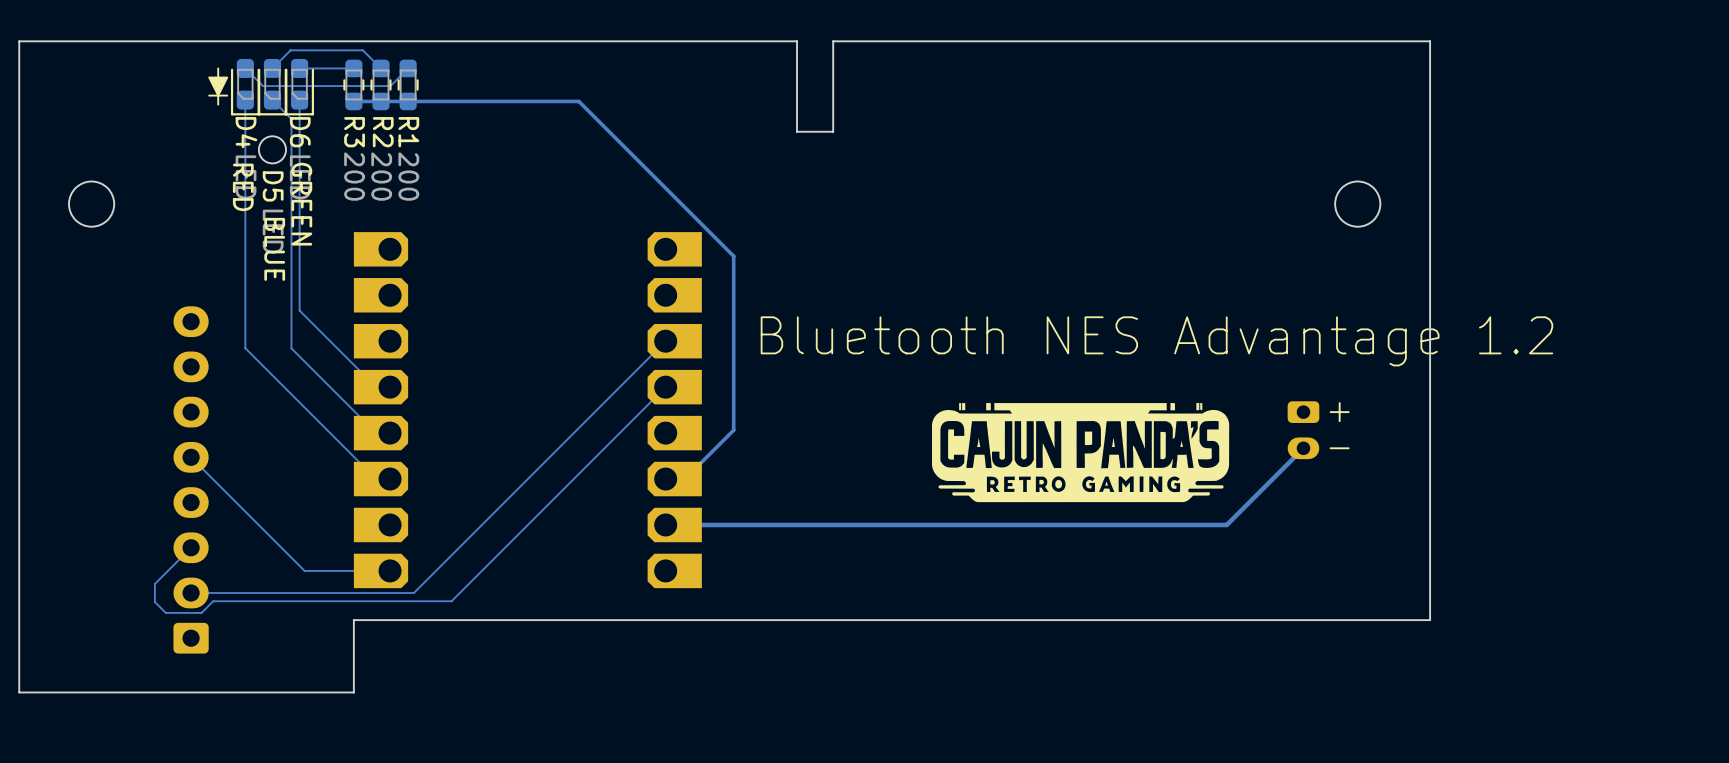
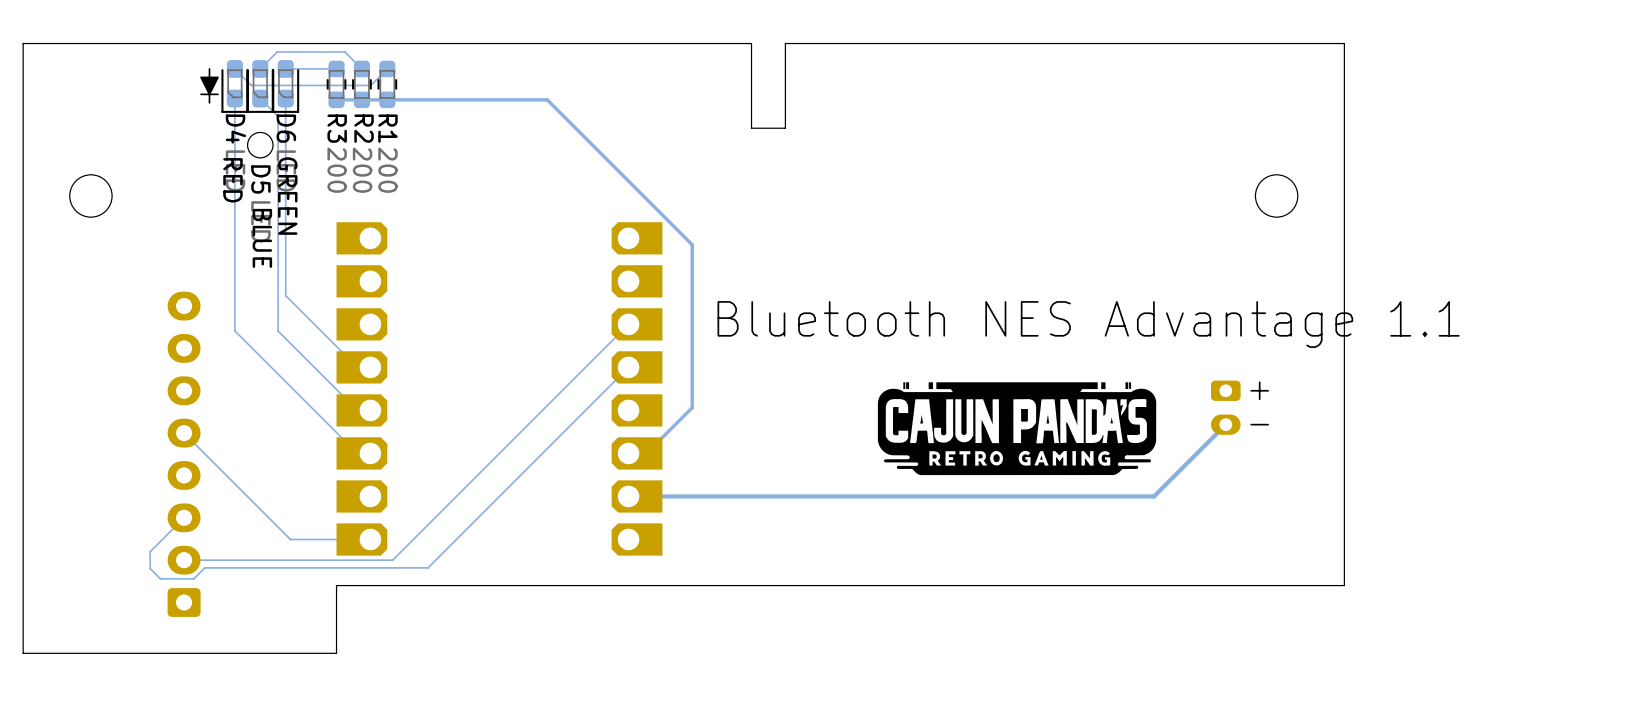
text: Bluetooth NES Advantage 1.2 (1156, 341) -> Bluetooth NES Advantage 1.1 (1088, 324)

